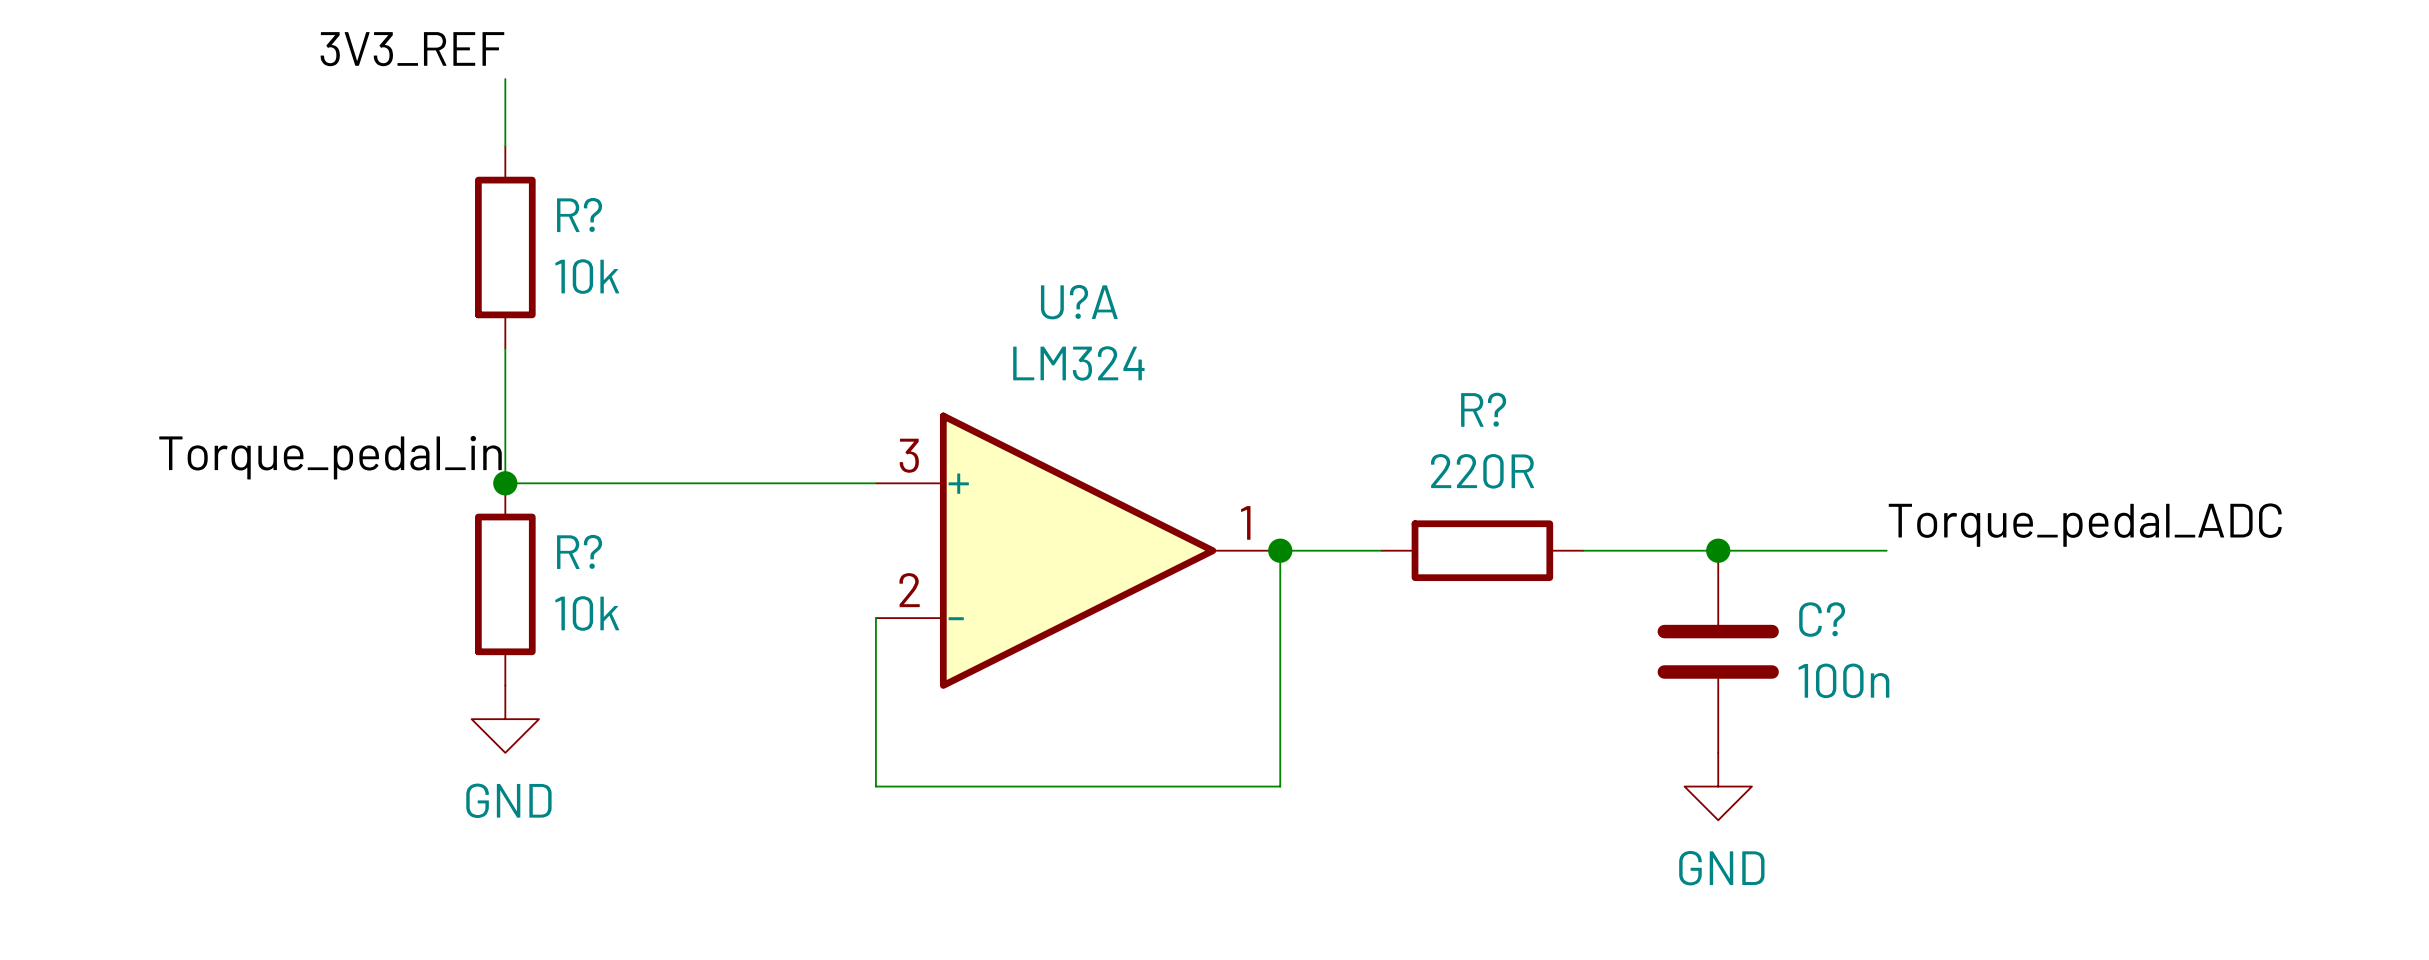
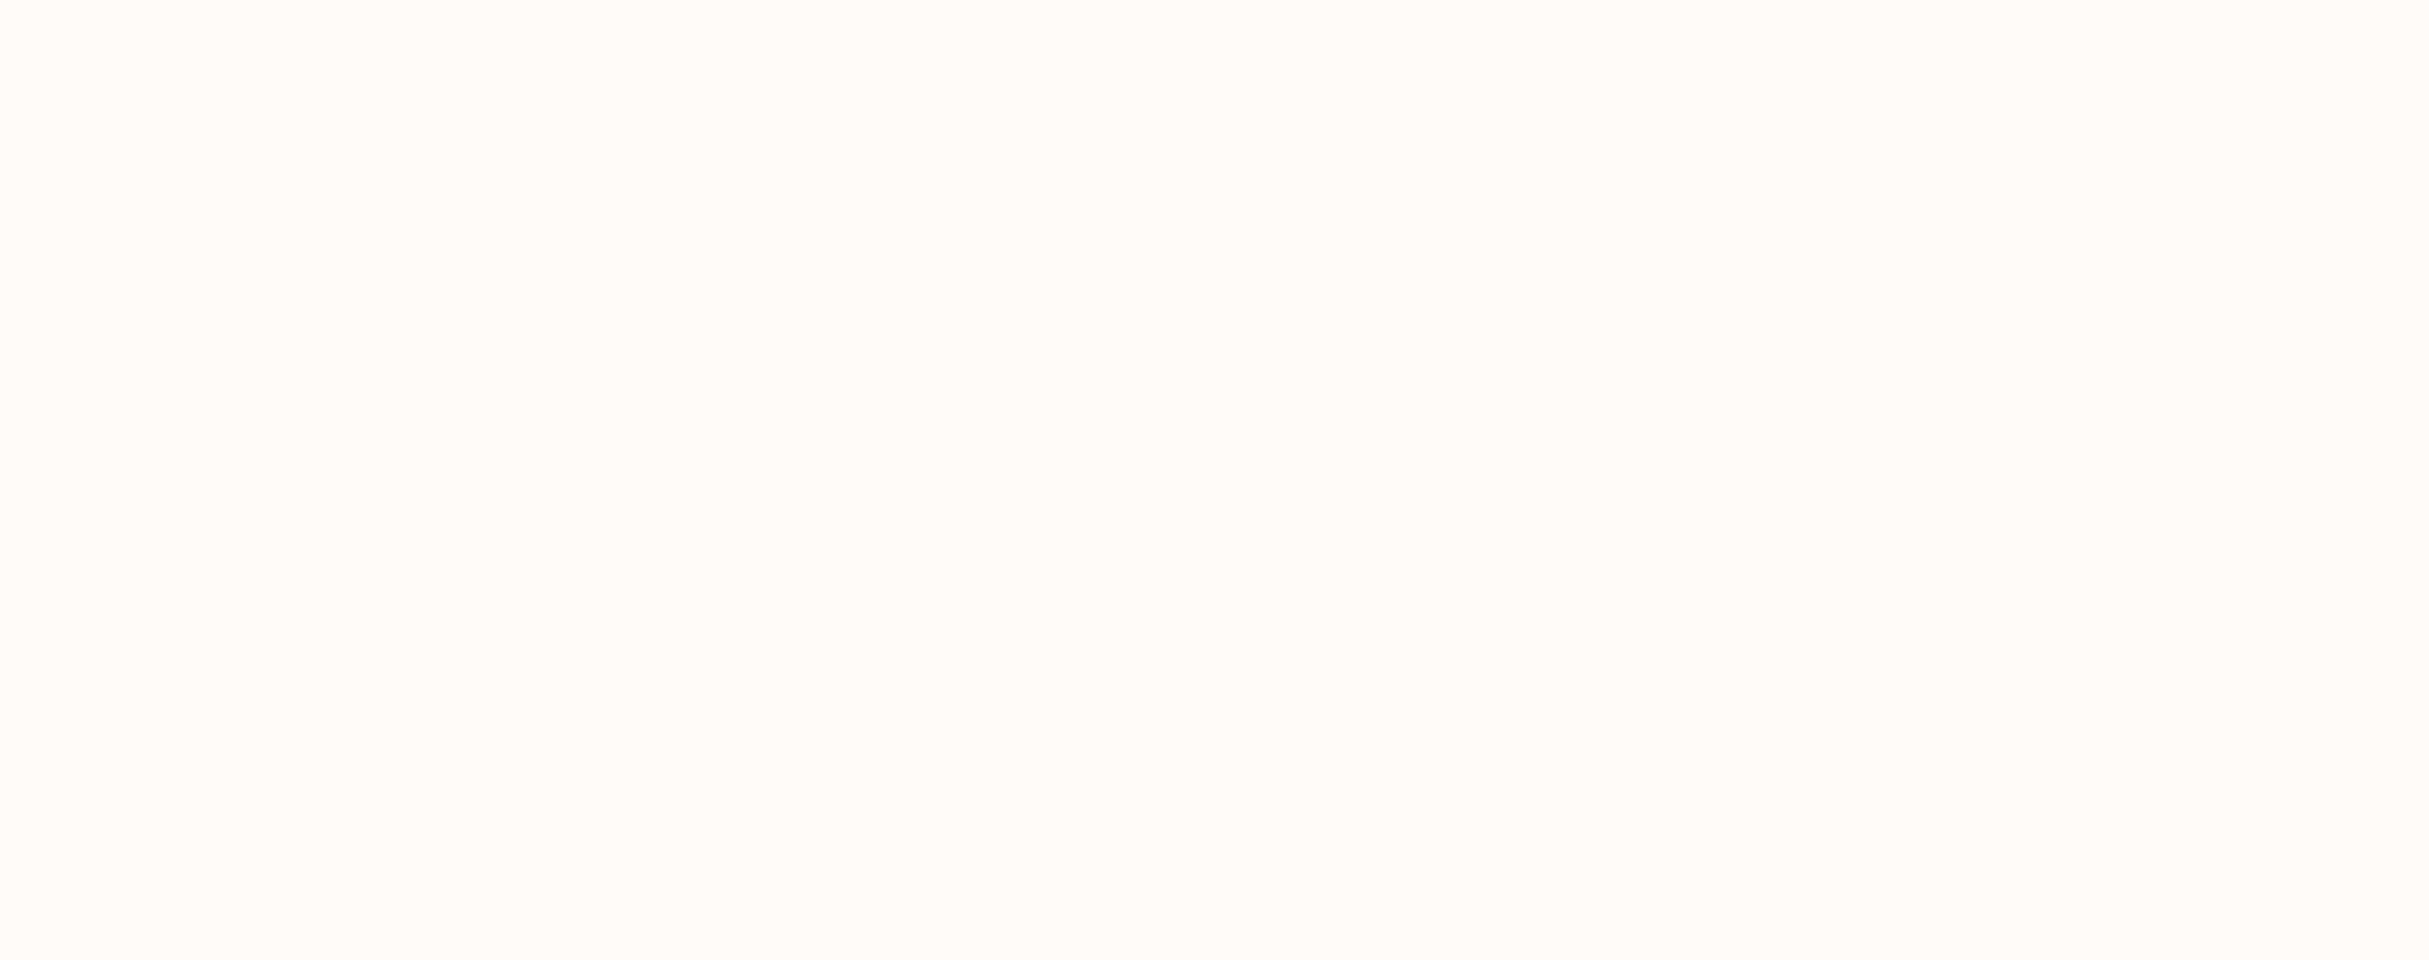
label: 3V3_REF (412, 49) -> none
wire: (505, 79) (505, 146) -> none
R?: 10k (505, 247) -> none
wire: (505, 348) (505, 483) (875, 483) -> none
label: Torque_pedal_in (330, 457) -> none
junction: (505, 483) -> none
label: Torque_pedal_ADC (2085, 525) -> none
U?A: LM324 (1078, 550) -> none
junction: (1280, 550) -> none
wire: (1381, 550) (1280, 550) (1280, 786) (875, 786) (875, 618) -> none
R?: 220R (1482, 550) -> none
wire: (1583, 550) (1886, 550) -> none
junction: (1718, 550) -> none
R?: 10k (505, 584) -> none
C?: 100n (1718, 651) -> none
power symbol: GND (505, 719) -> none
power symbol: GND (1718, 786) -> none

